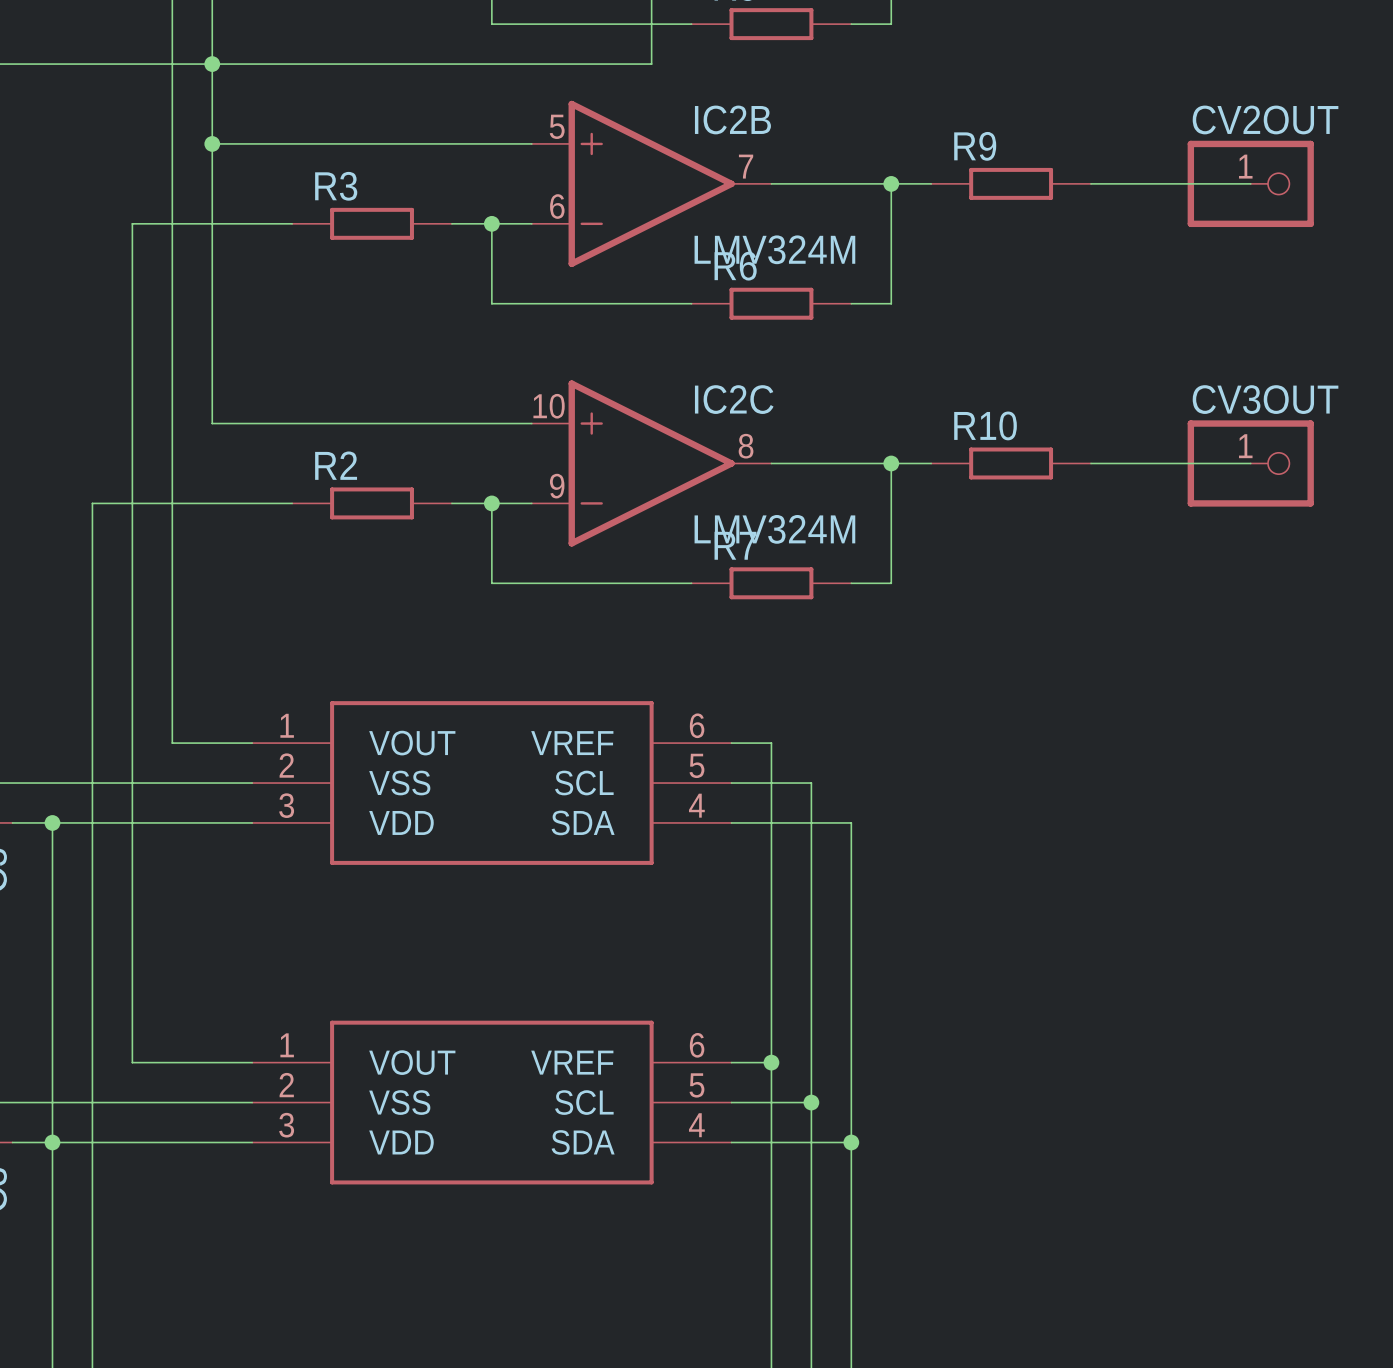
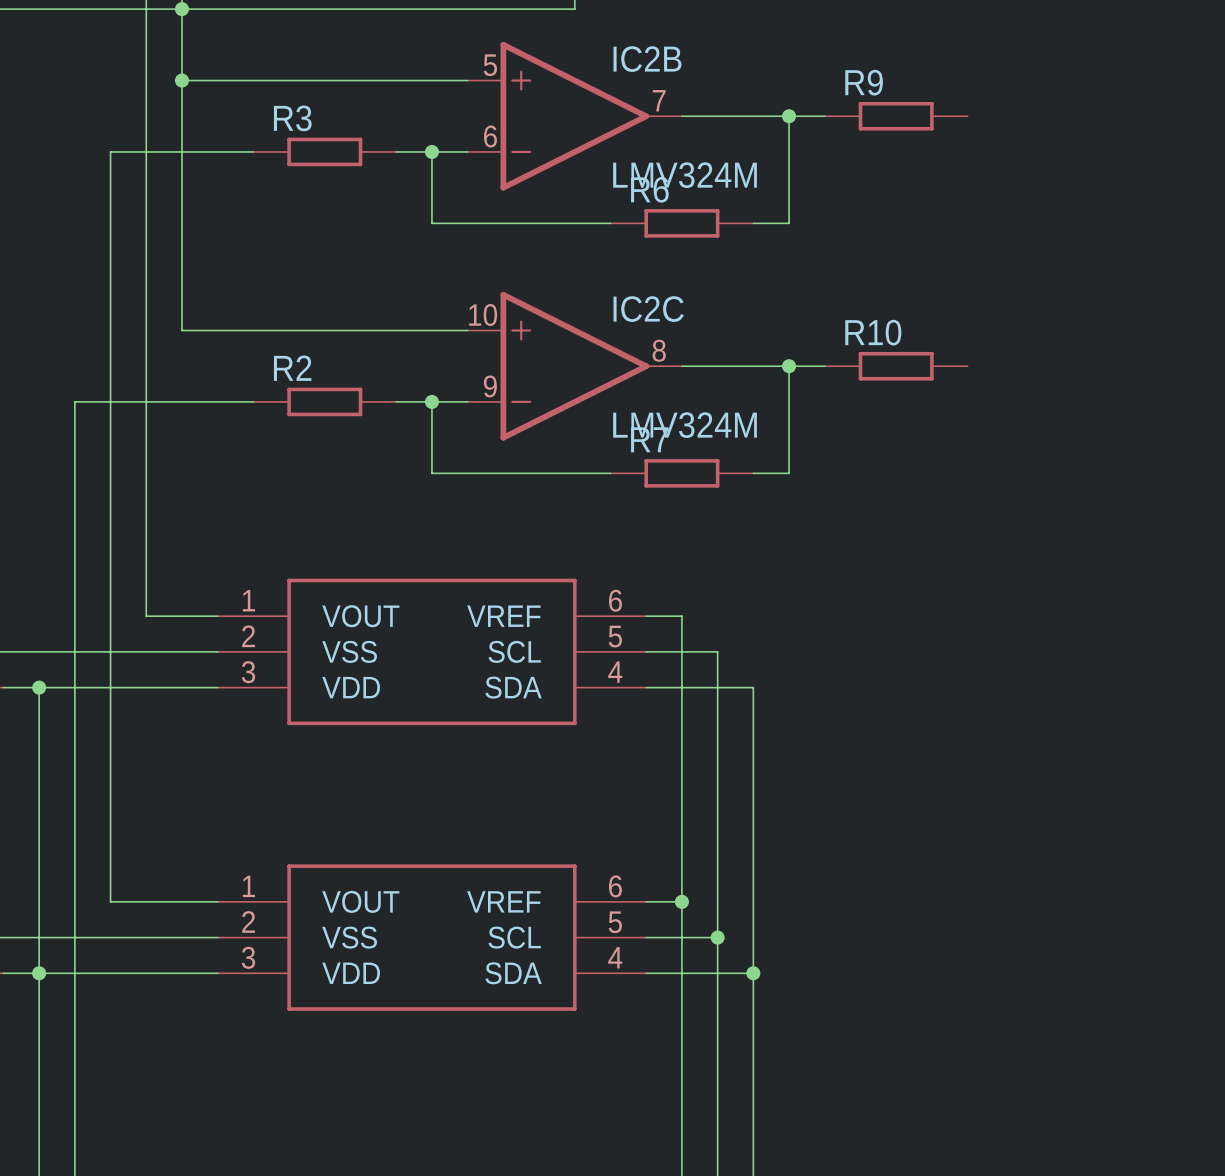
wire: (1090, 183) (1250, 183) -> none
CV2OUT: (1250, 183) -> none
wire: (1090, 463) (1250, 463) -> none
CV3OUT: (1250, 463) -> none

